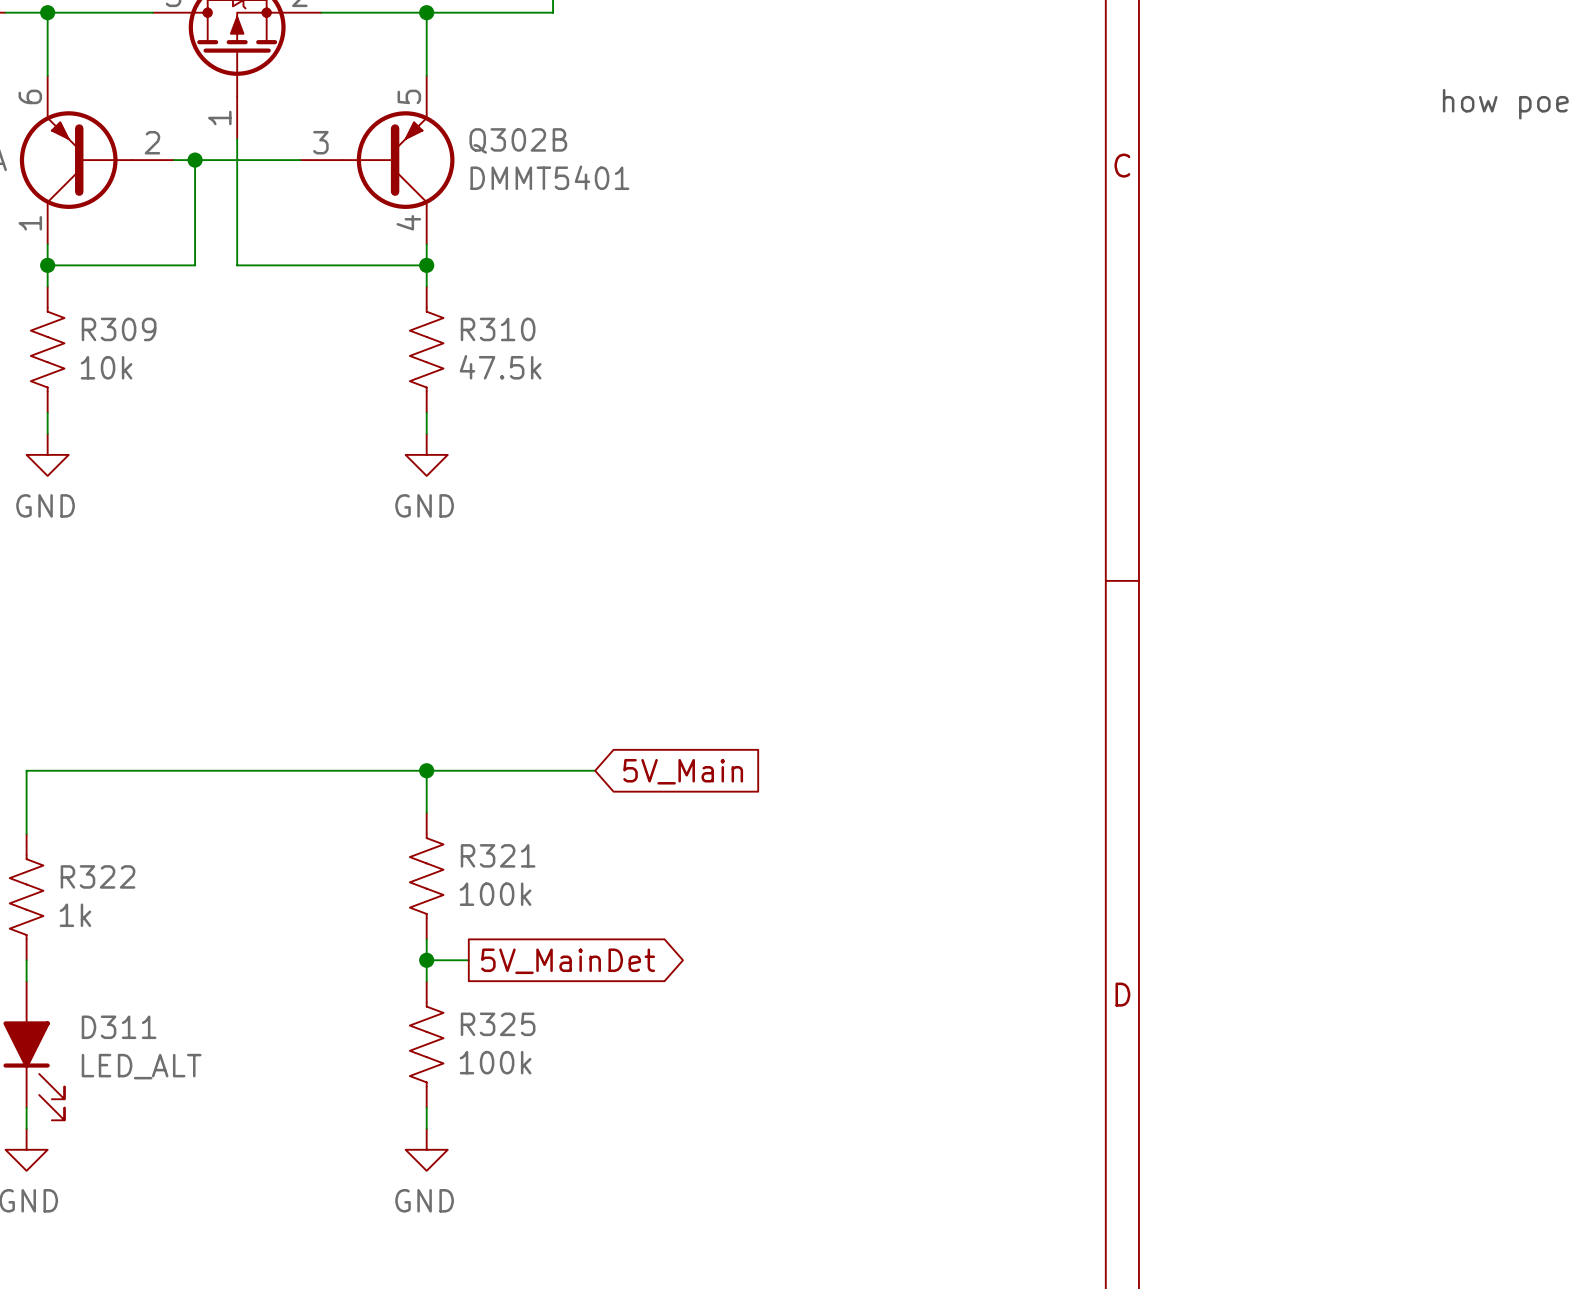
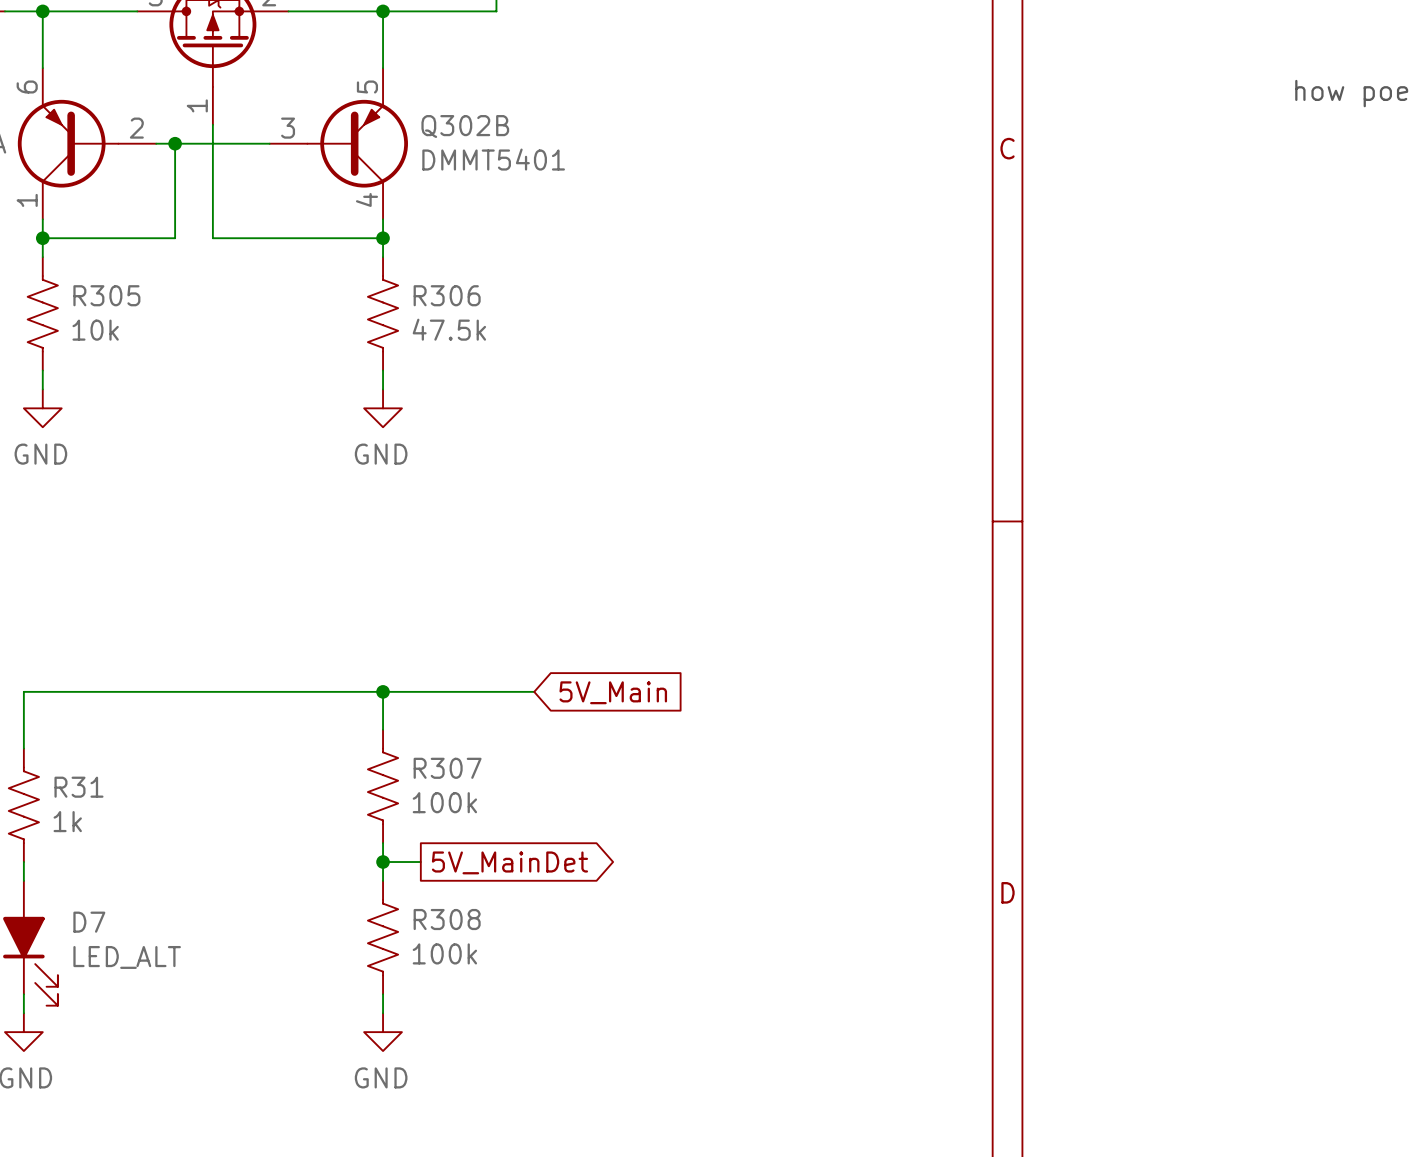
R309 name: R309 (119, 329) -> R305 (106, 295)
R310 name: R310 (498, 329) -> R306 (447, 295)
R321 name: R321 (498, 855) -> R307 (447, 768)
R322 name: R322 (98, 876) -> R31 (78, 787)
R325 name: R325 (498, 1024) -> R308 (447, 919)
D311 name: D311 (119, 1027) -> D7 (89, 922)

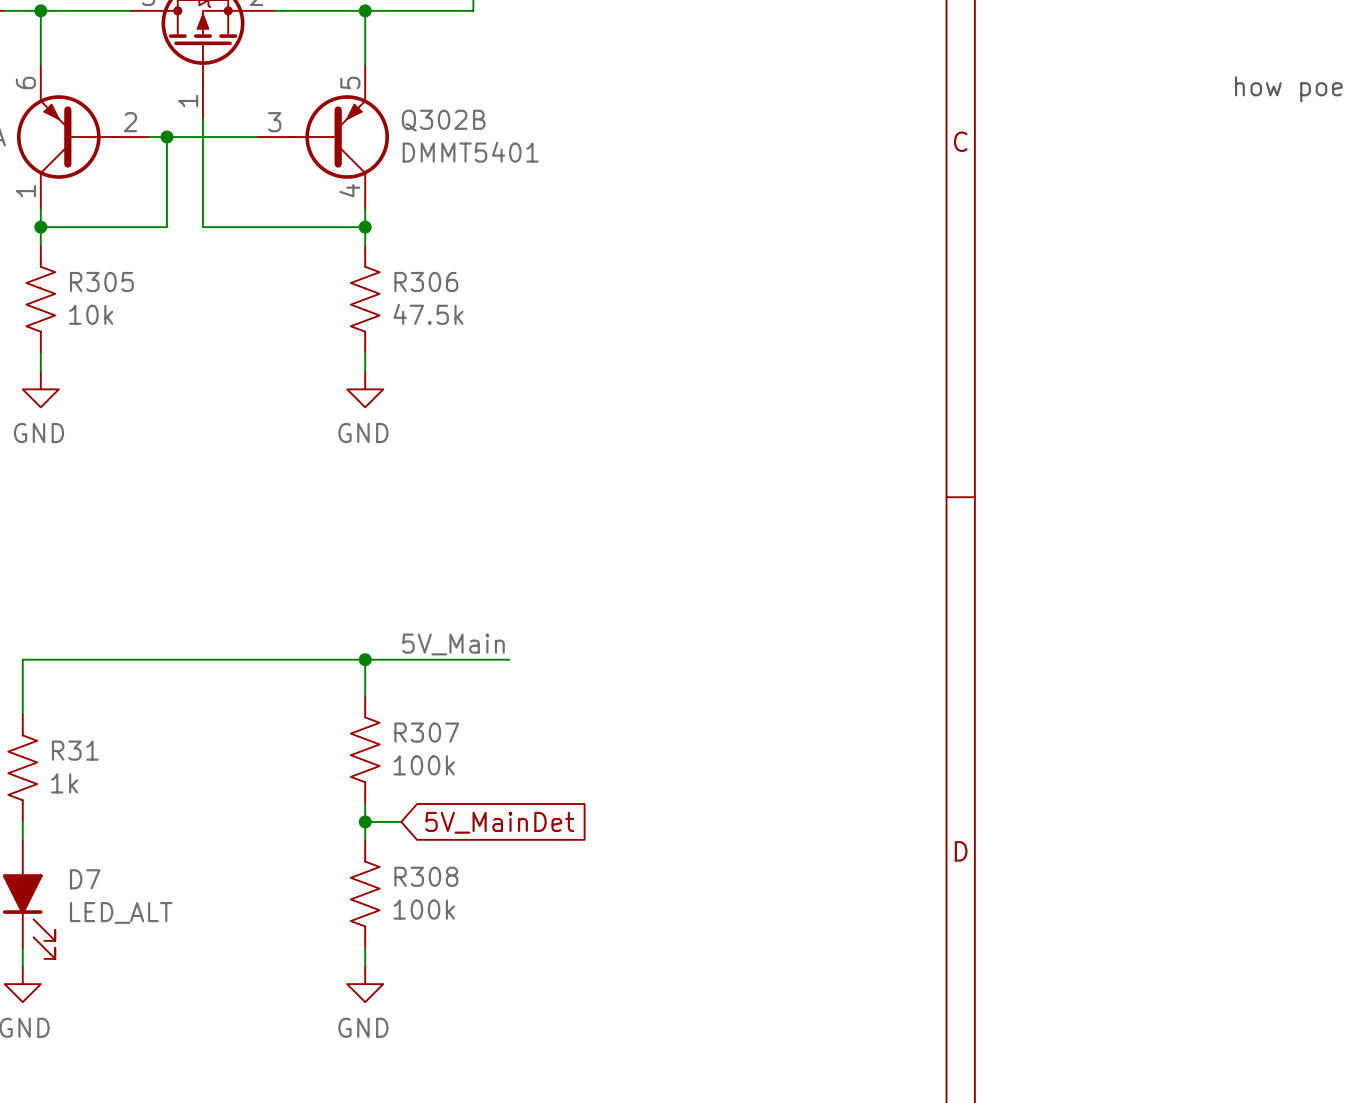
label: none -> 5V_Main (453, 644)
global label: 5V_Main (613, 692) -> none
global label shape: output (509, 862) -> input (499, 822)

